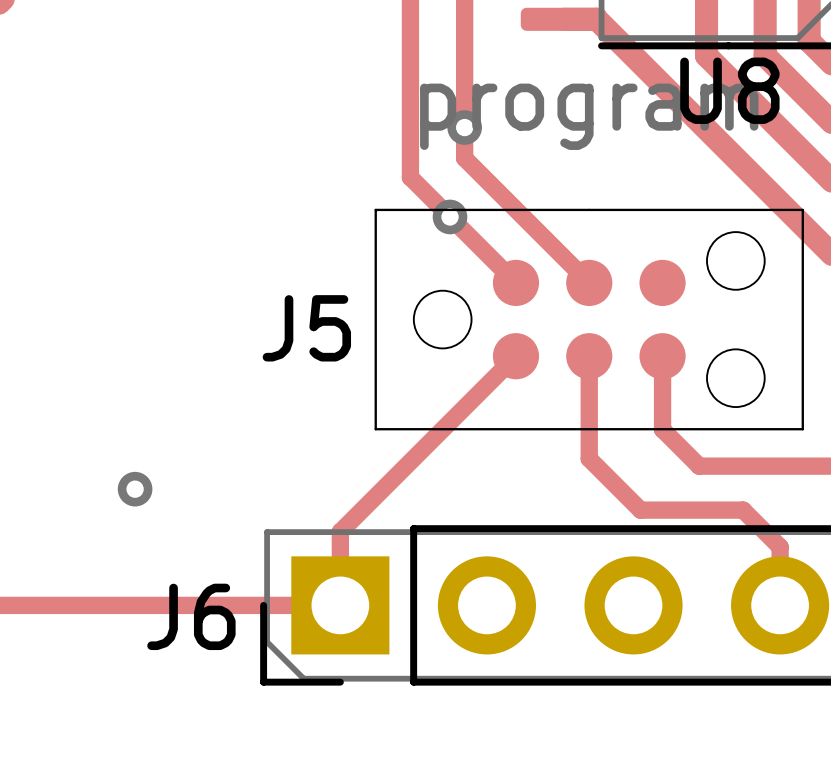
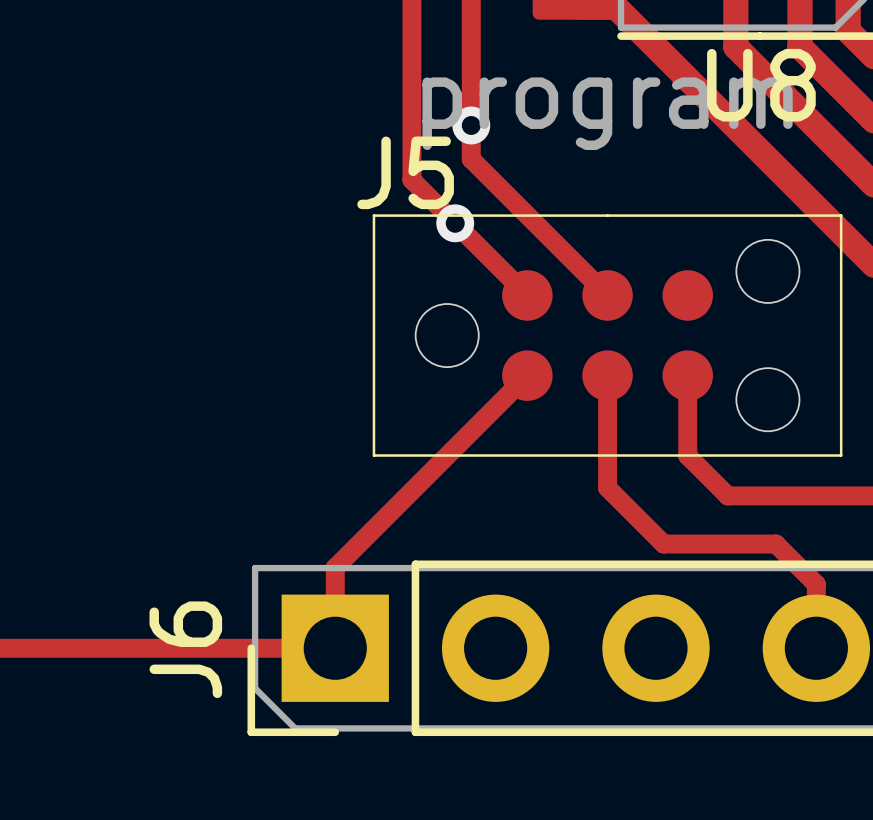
J5 name position: J5 (306, 328) -> J5 (405, 172)
via: (135, 489) -> none
J6 name rotation: 0° (191, 616) -> 90° counterclockwise (185, 649)

